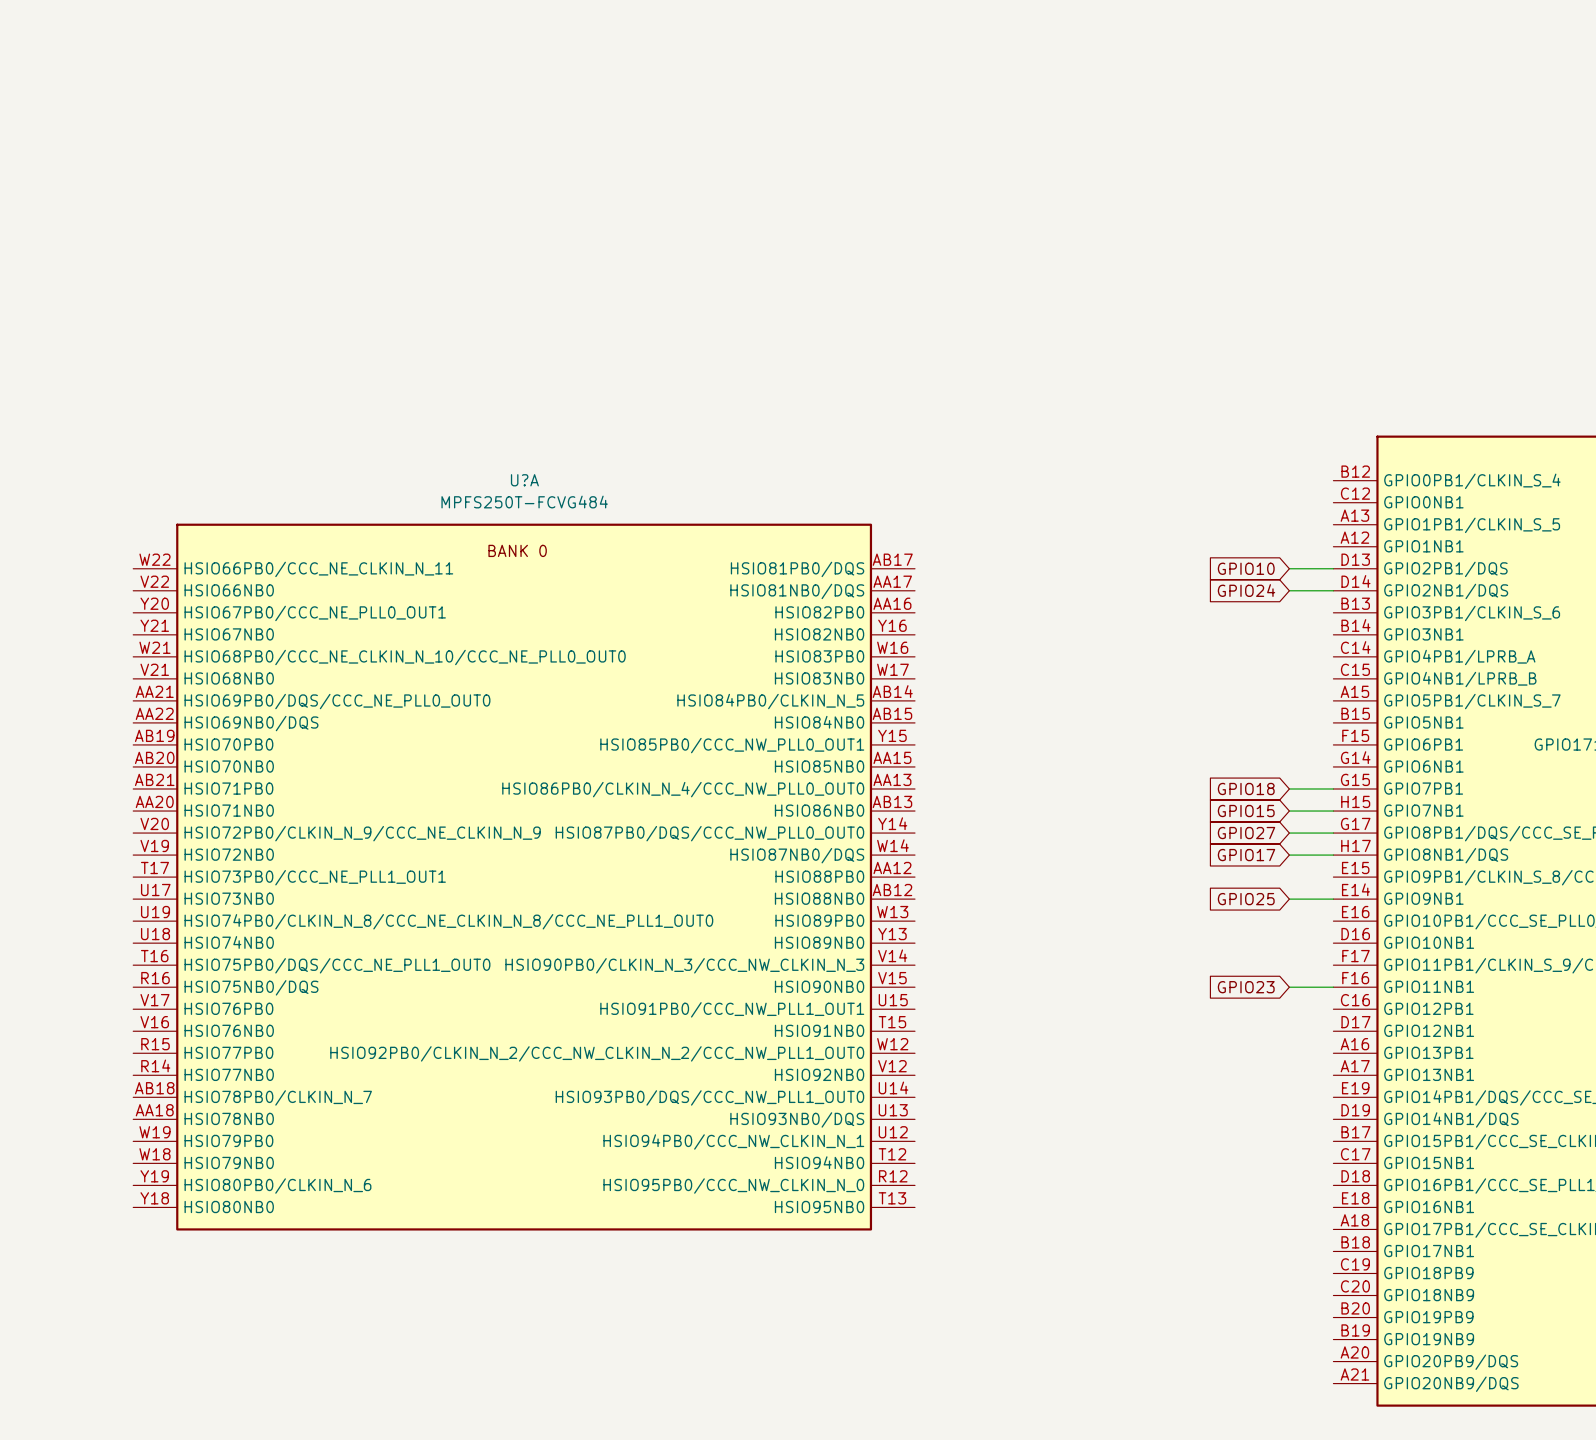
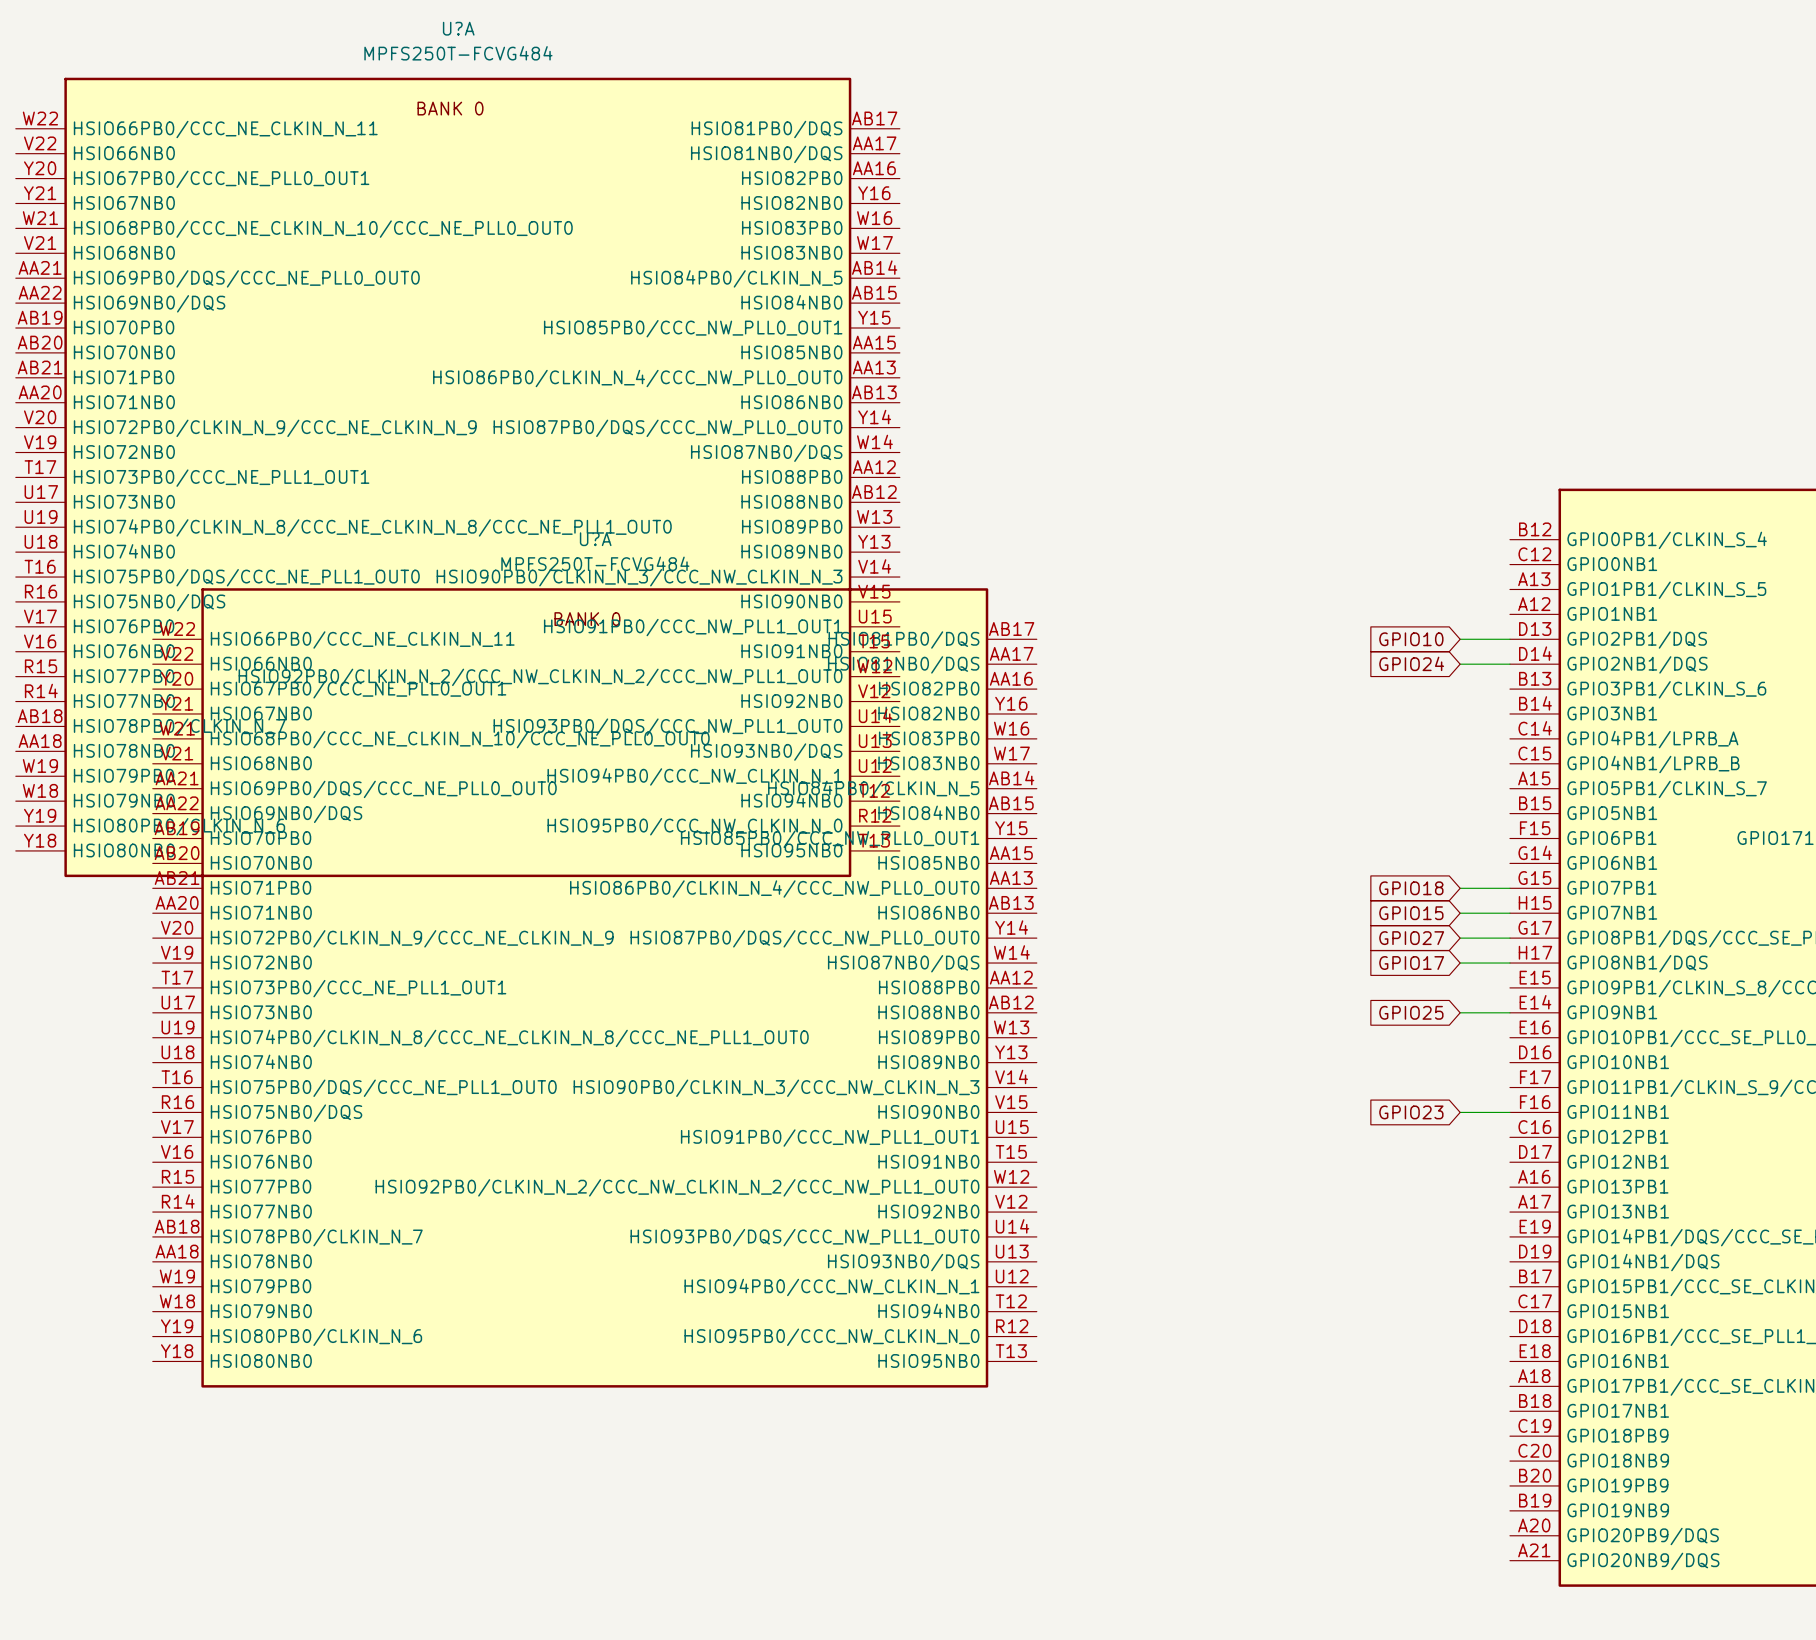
U?A: none -> (457, 477)

